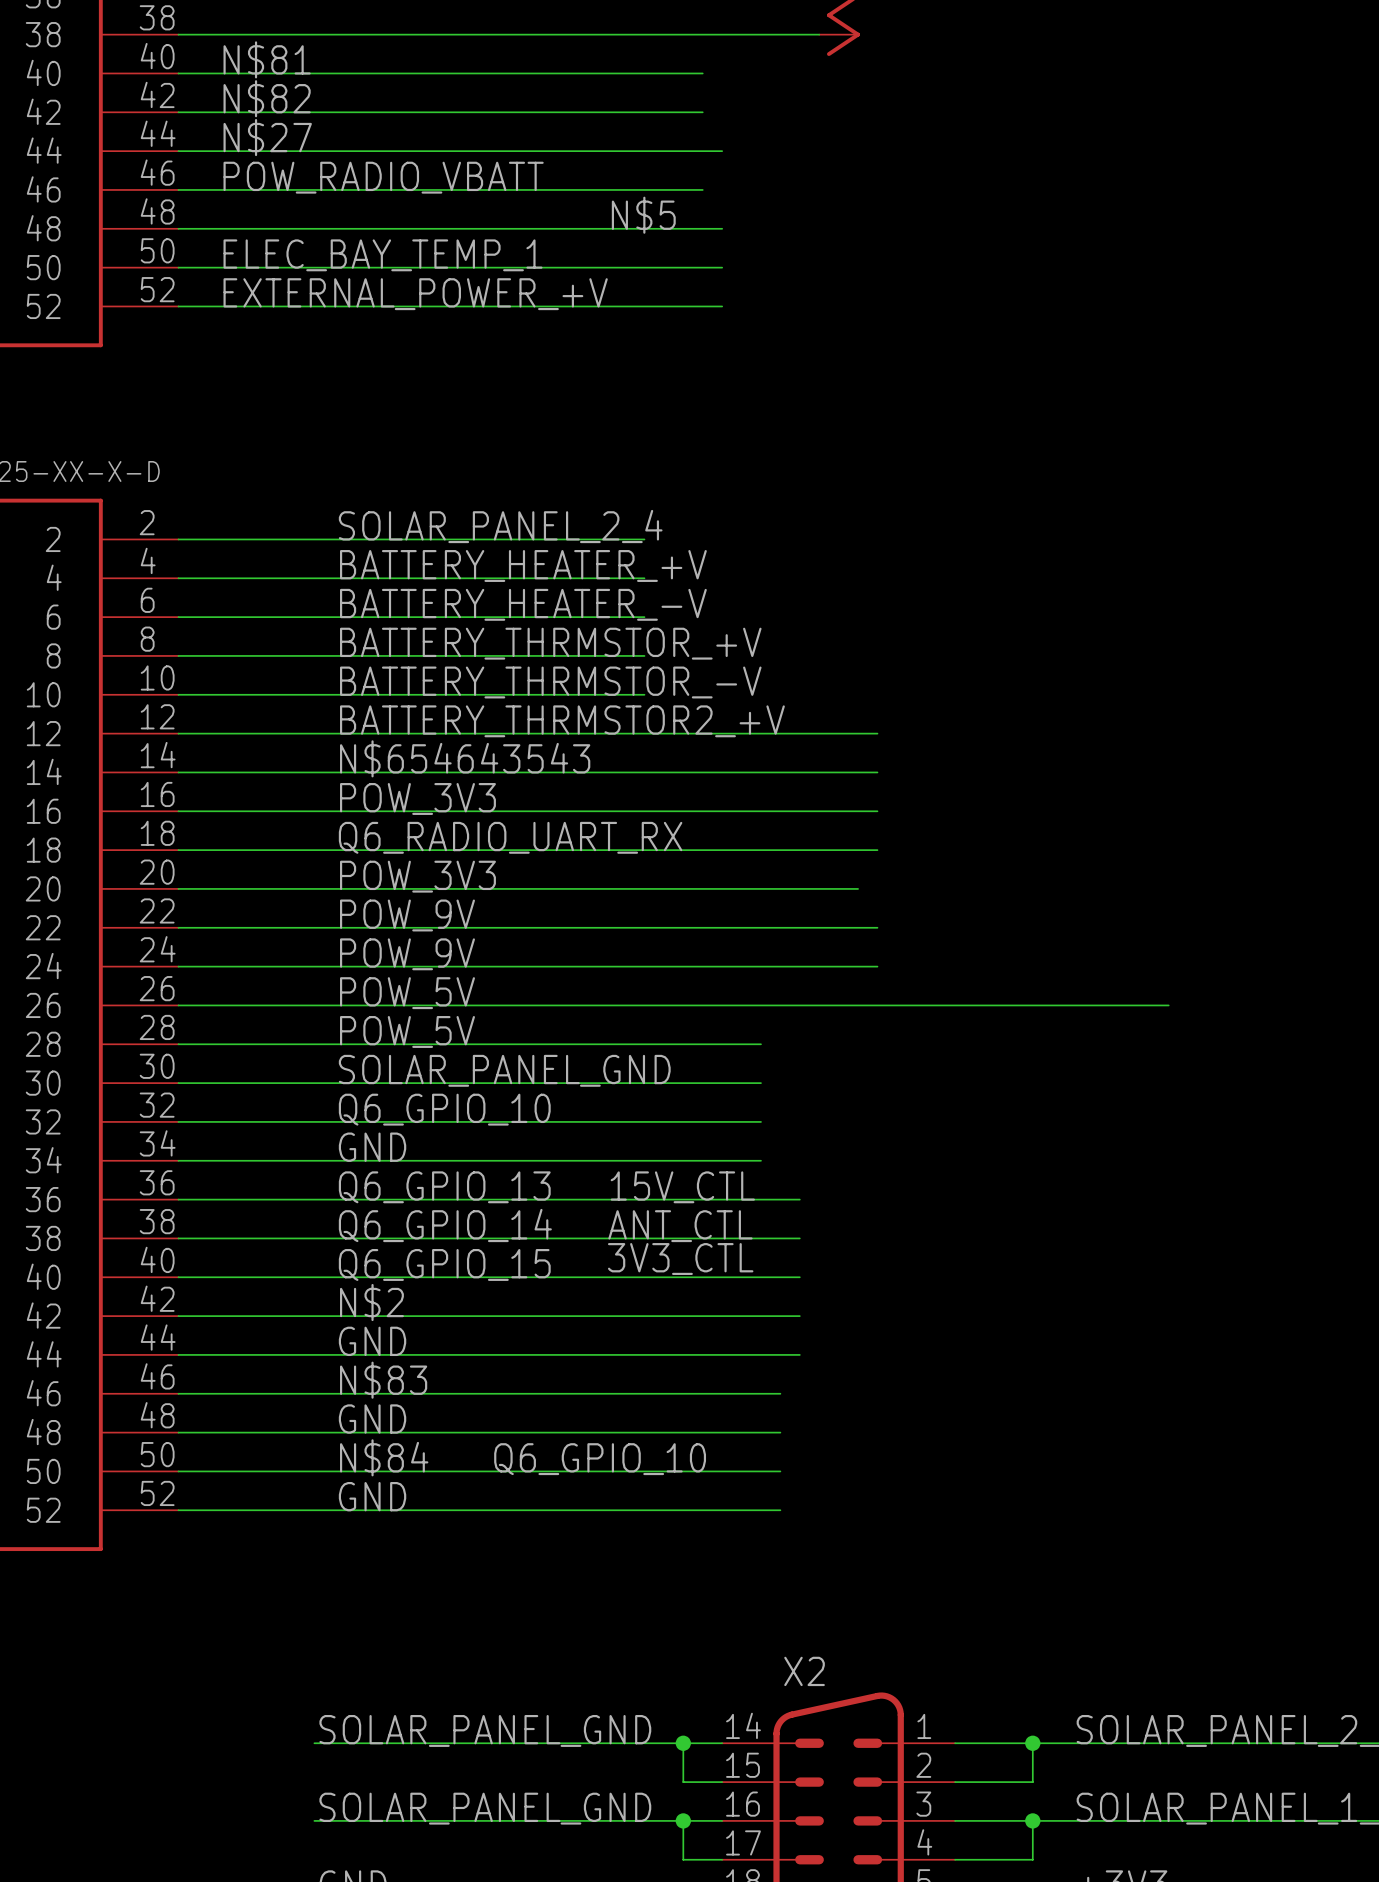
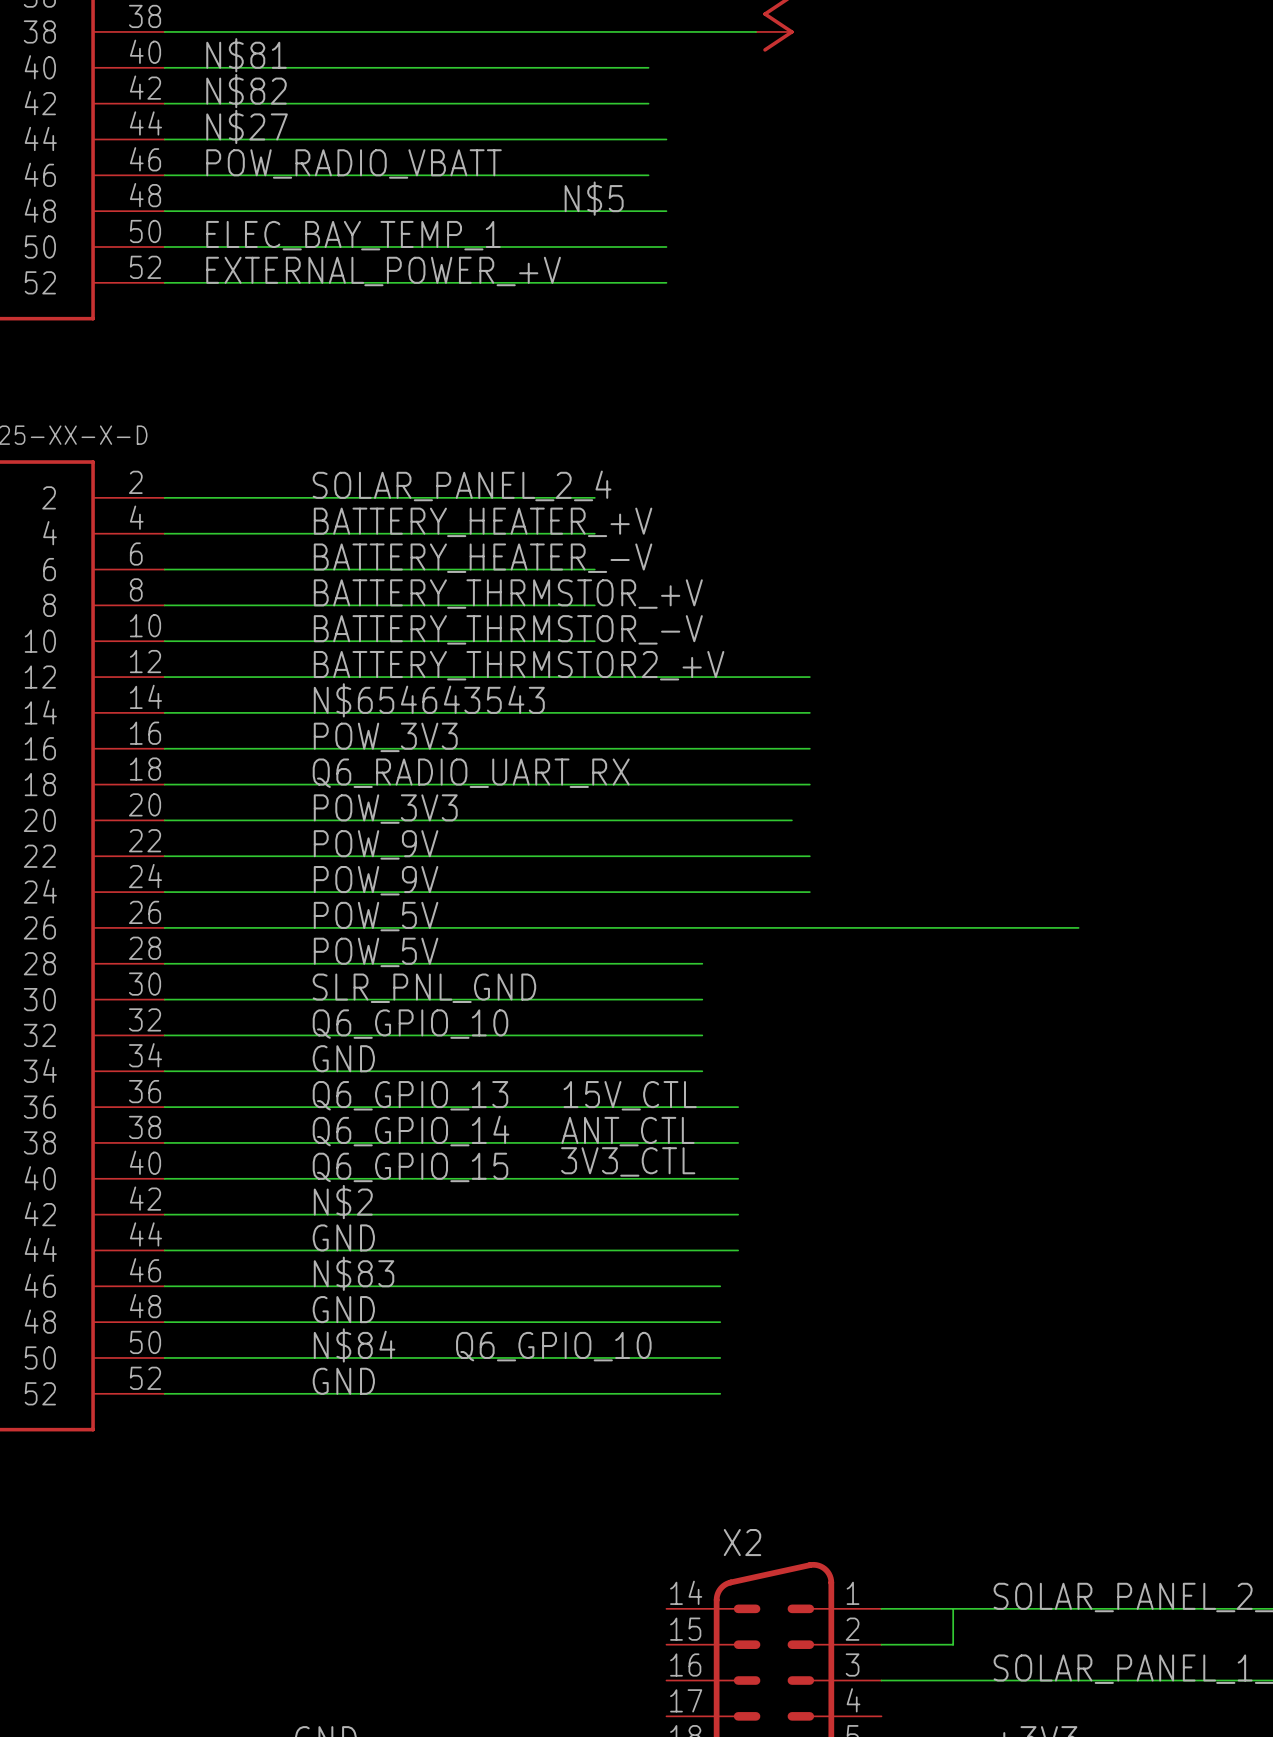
label: SOLAR_PANEL_GND (504, 1070) -> SLR_PNL_GND (424, 988)
label: SOLAR_PANEL_GND (485, 1730) -> none
wire: (314, 1743) (722, 1743) -> none
wire: (683, 1743) (683, 1782) (722, 1782) -> none
junction: (683, 1743) -> none
junction: (1032, 1743) -> none
label: SOLAR_PANEL_GND (485, 1808) -> none
wire: (314, 1820) (722, 1820) -> none
wire: (683, 1820) (683, 1859) (722, 1859) -> none
junction: (683, 1820) -> none
wire: (1032, 1820) (1032, 1859) (955, 1859) -> none
junction: (1032, 1820) -> none

